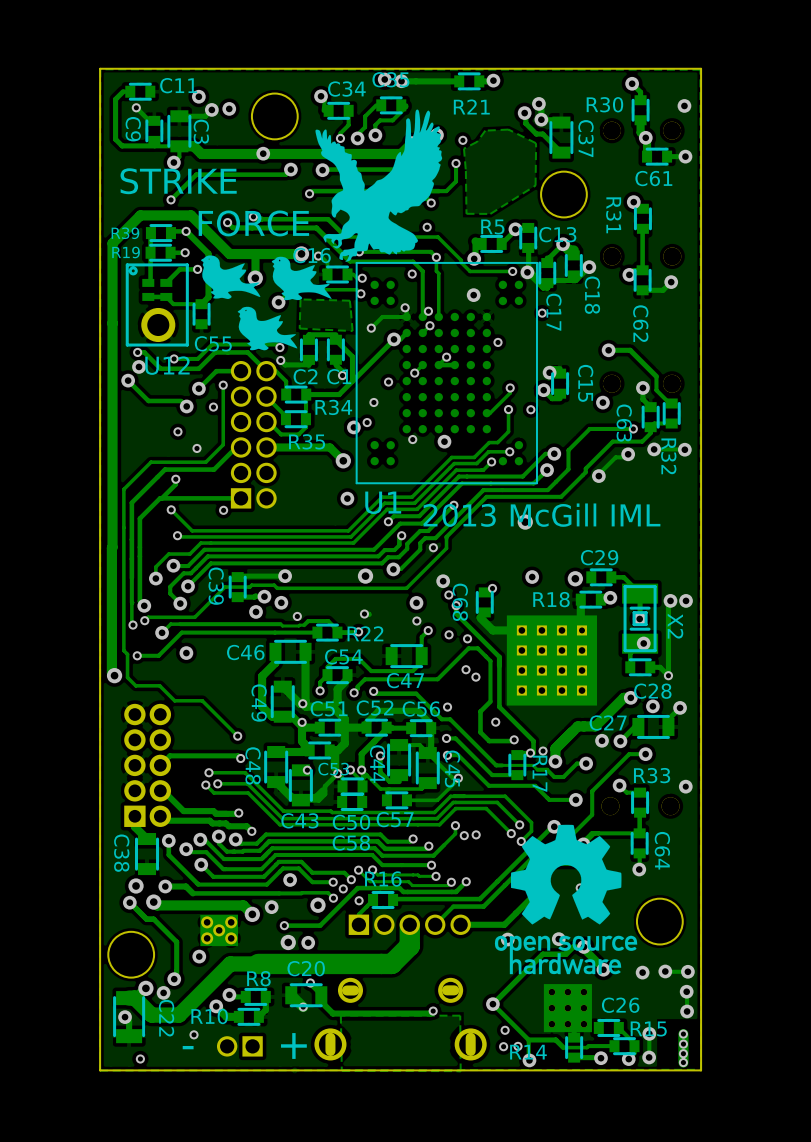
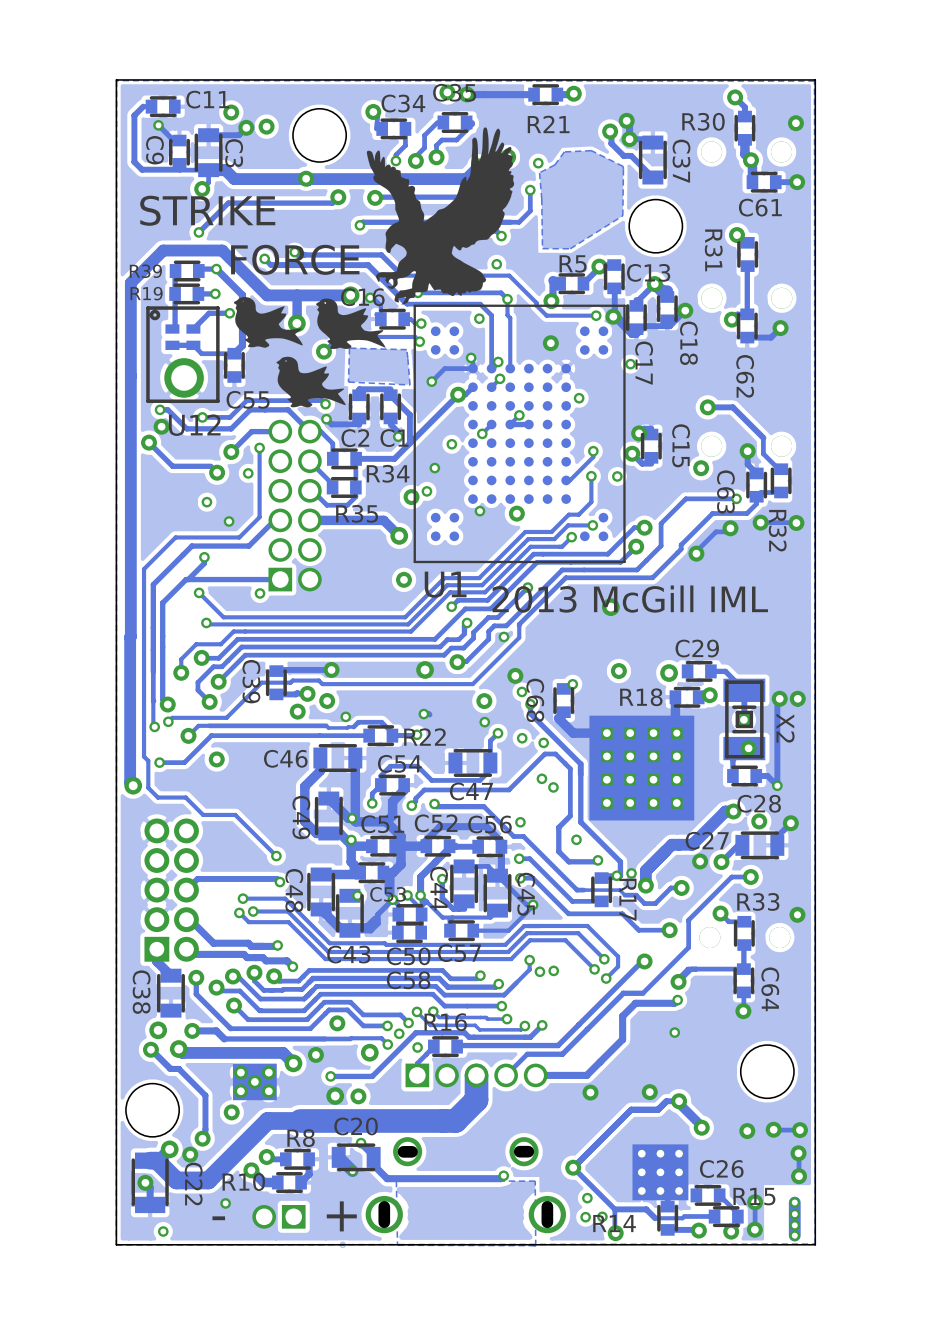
drawing: [494, 824, 638, 975] -> none

